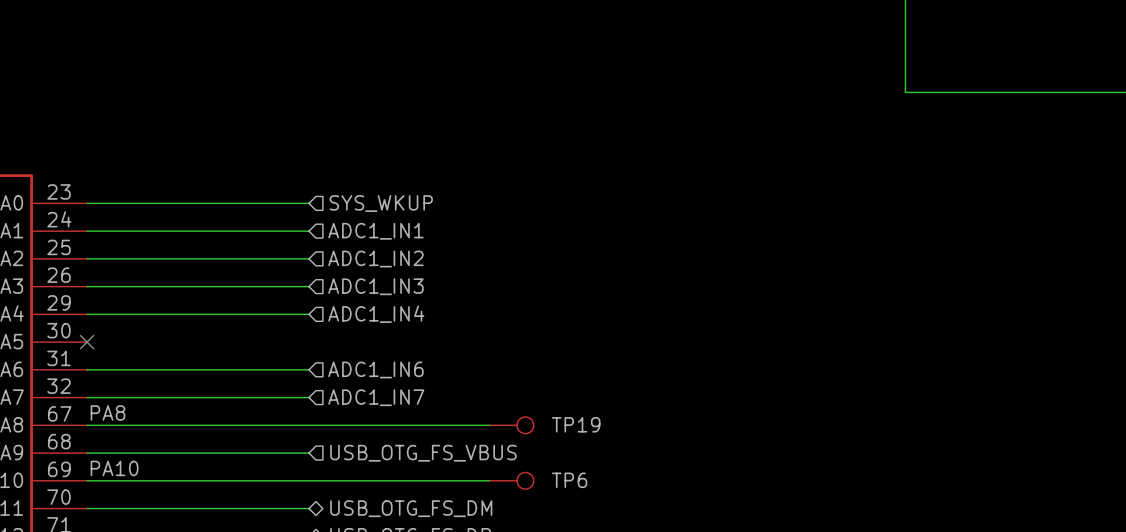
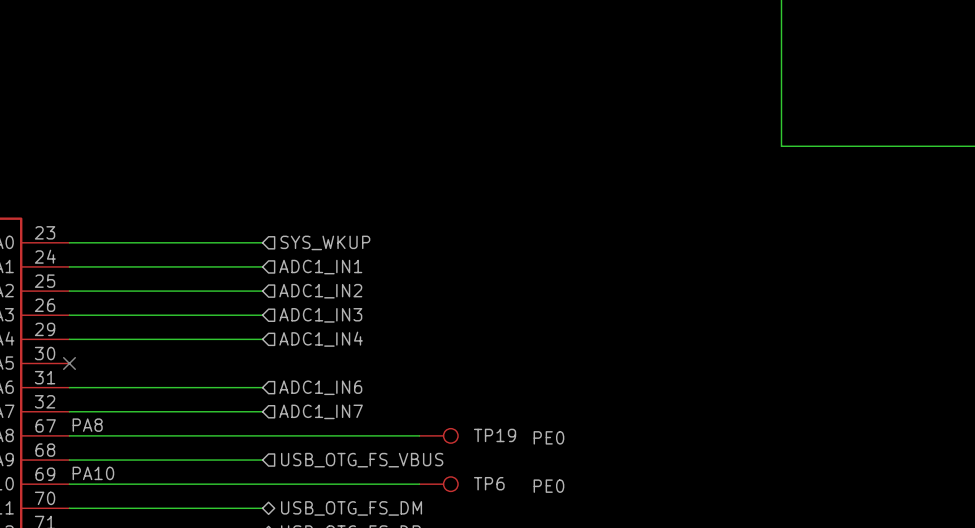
TP19 value: none -> PE0 (548, 437)
TP6 value: none -> PE0 (548, 486)

